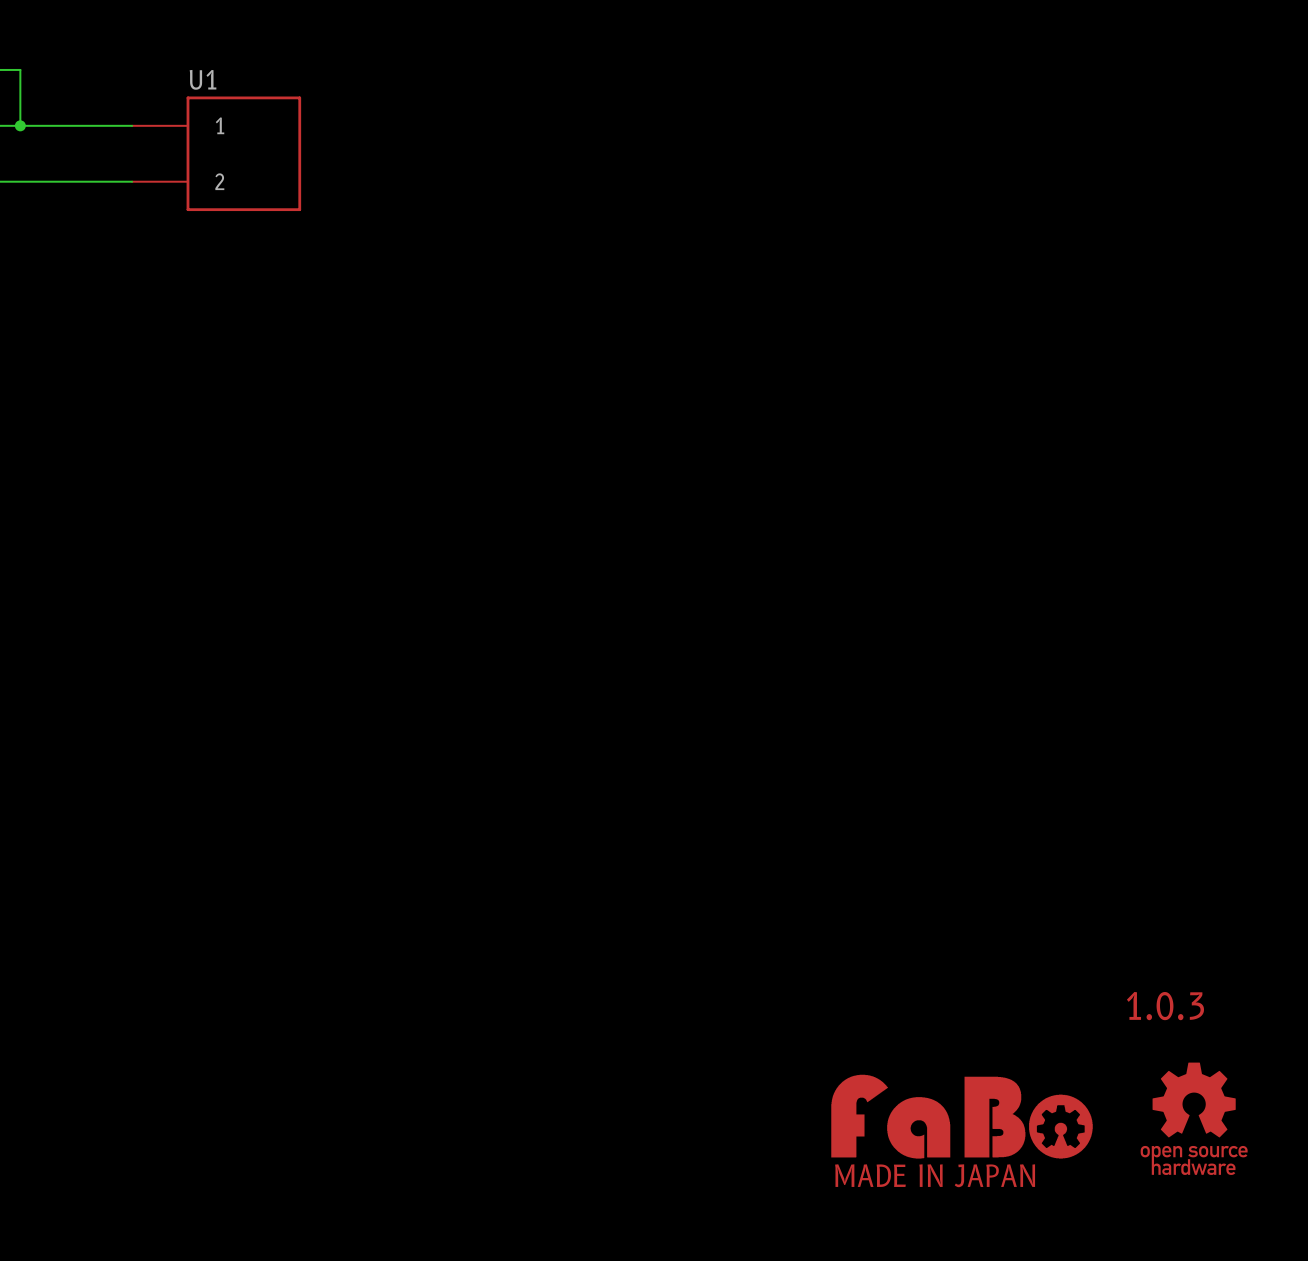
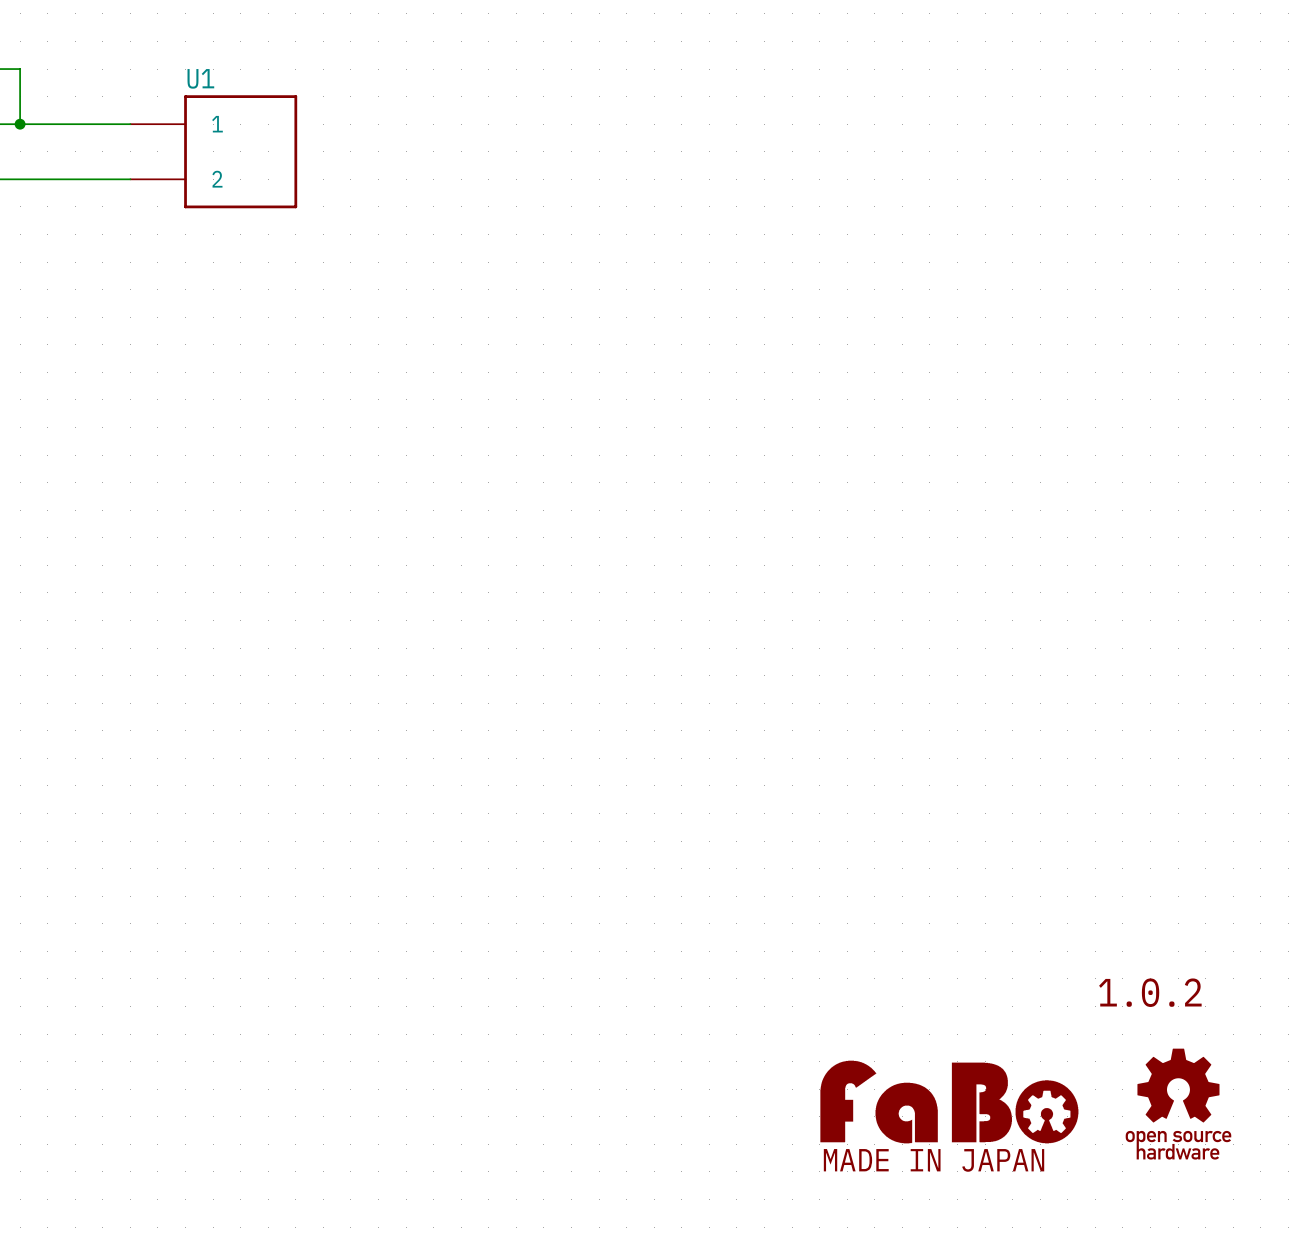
text: 1.0.3 (1165, 1006) -> 1.0.2 (1150, 992)

